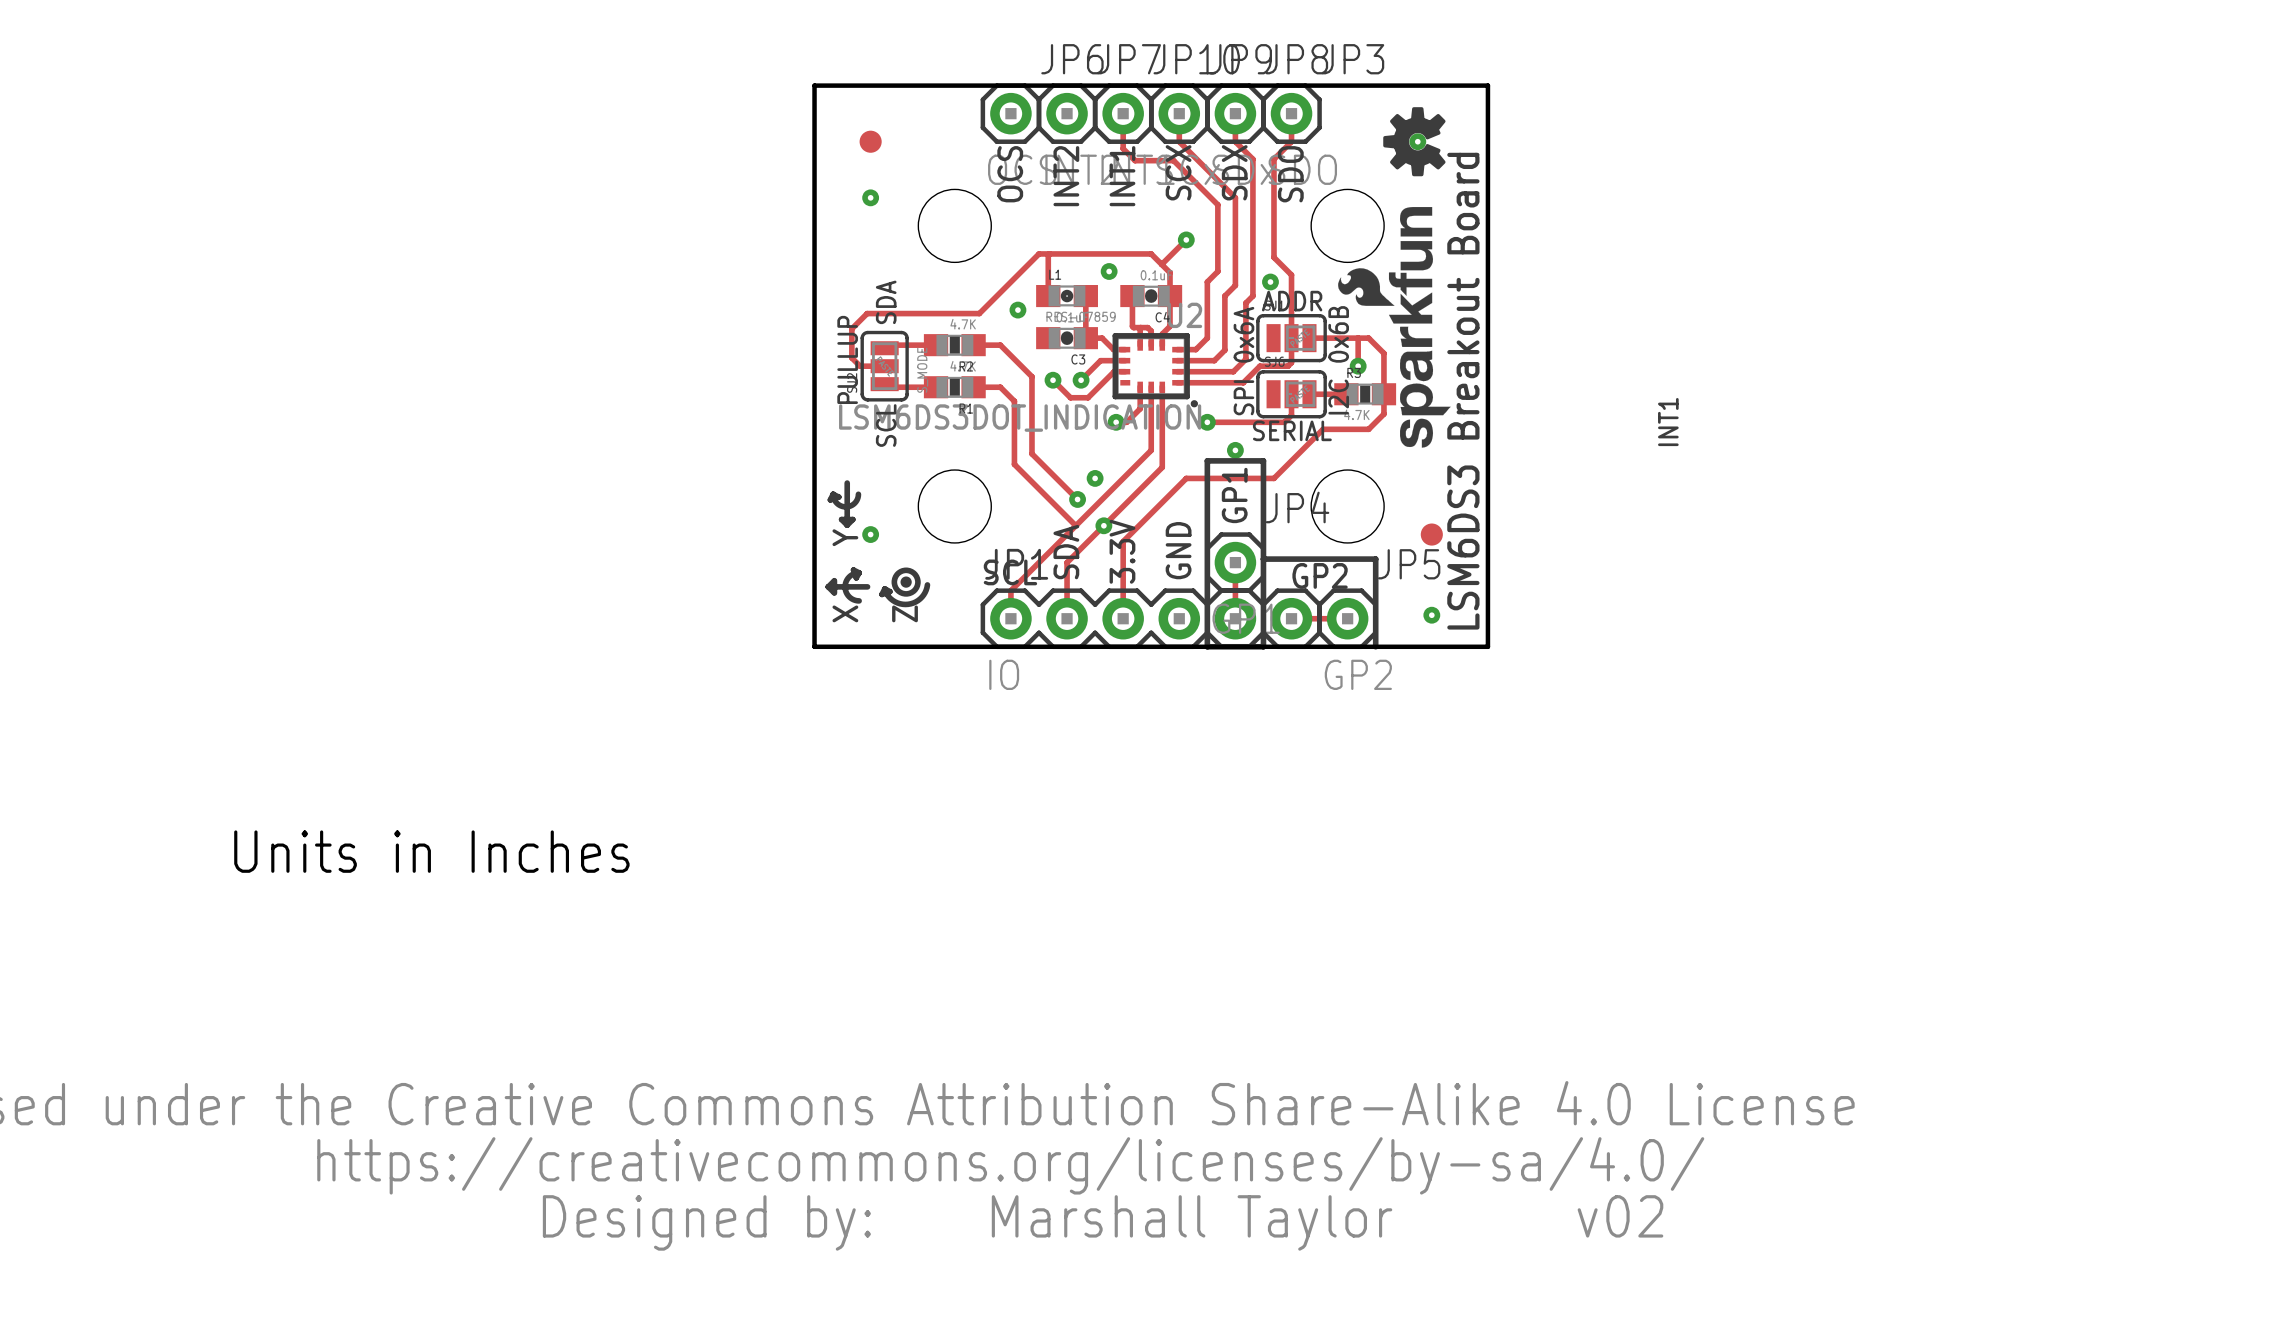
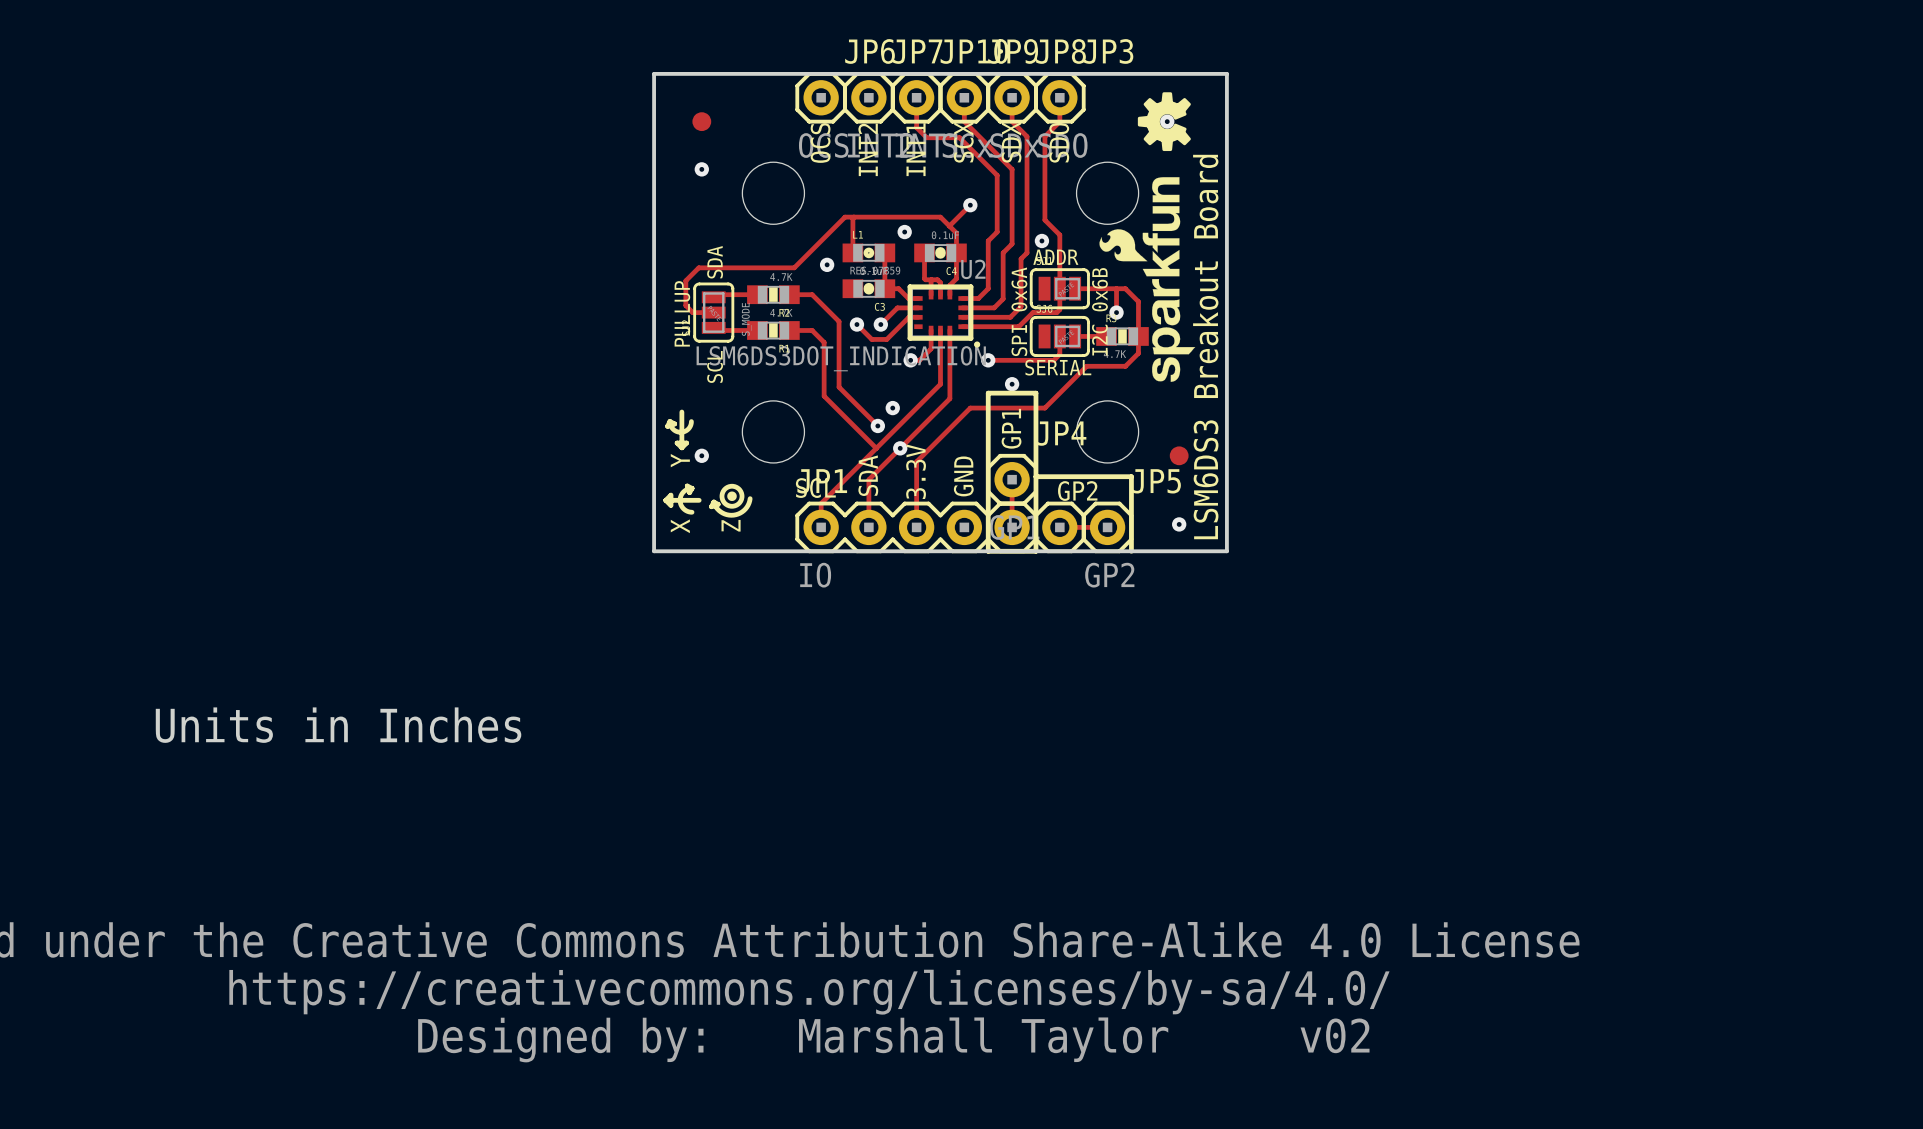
text: INT1 (1668, 422) -> none

